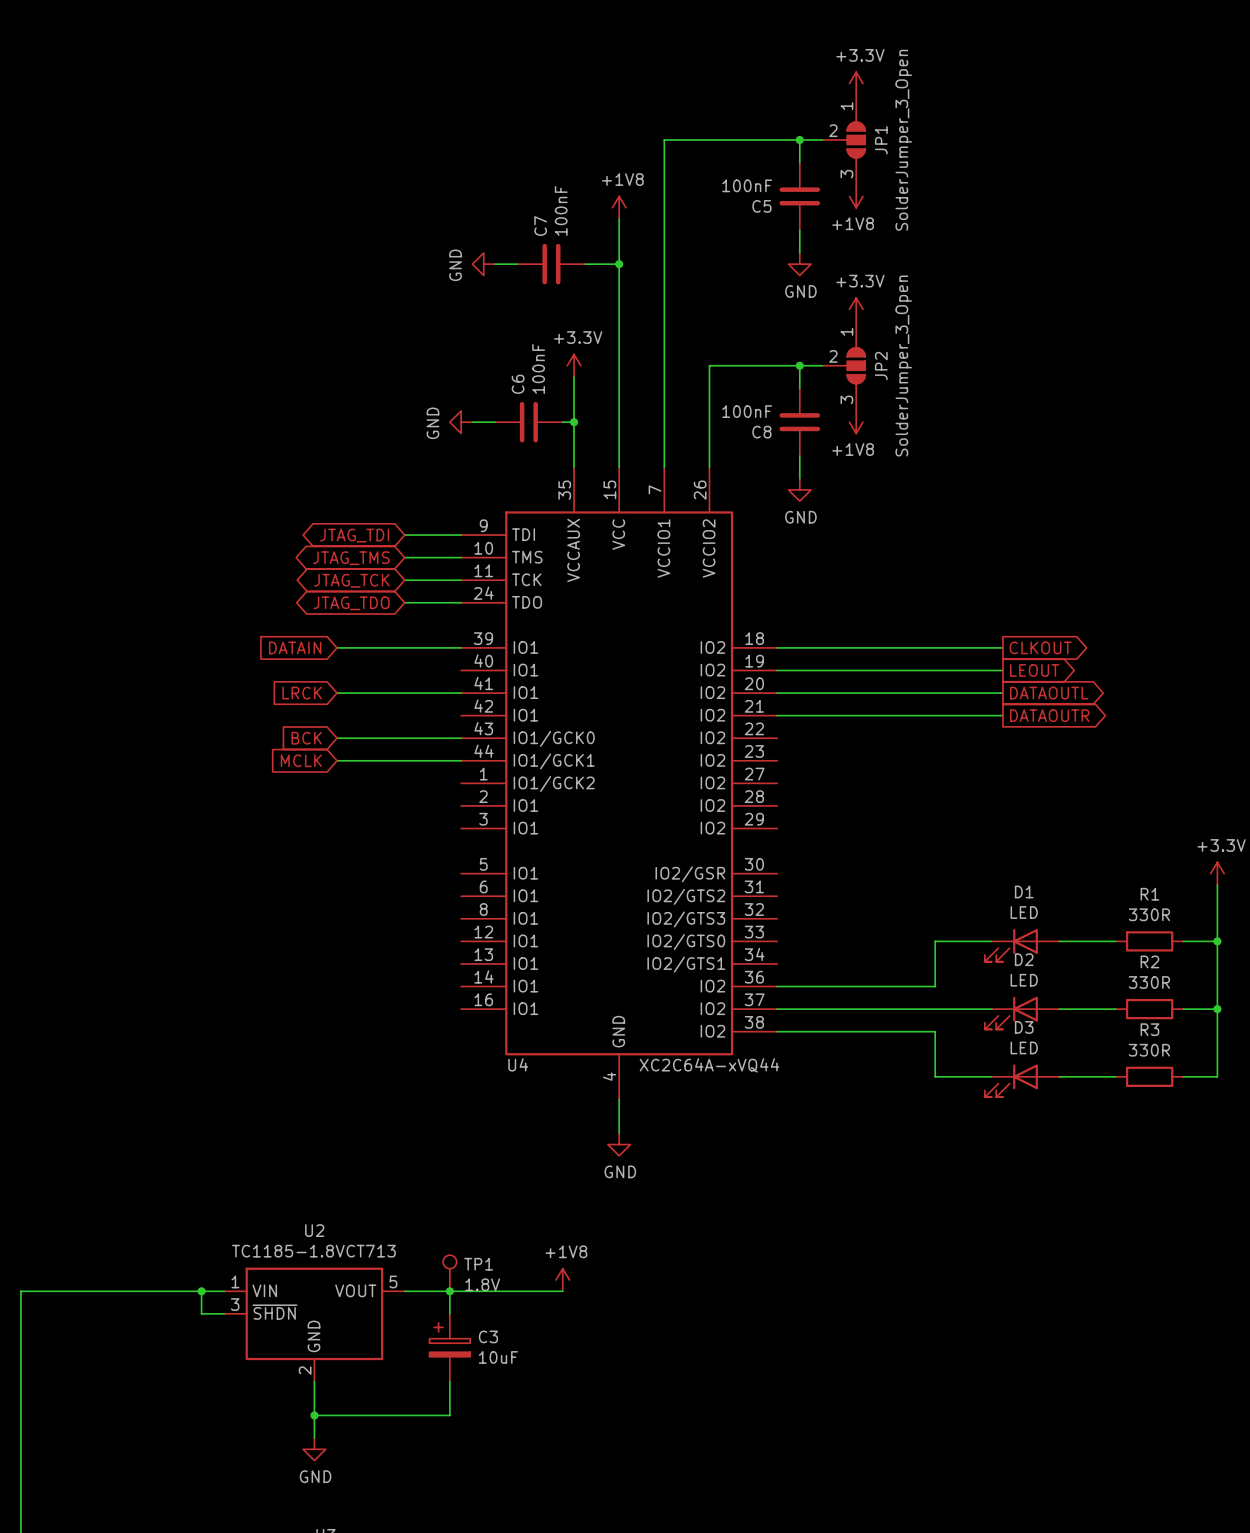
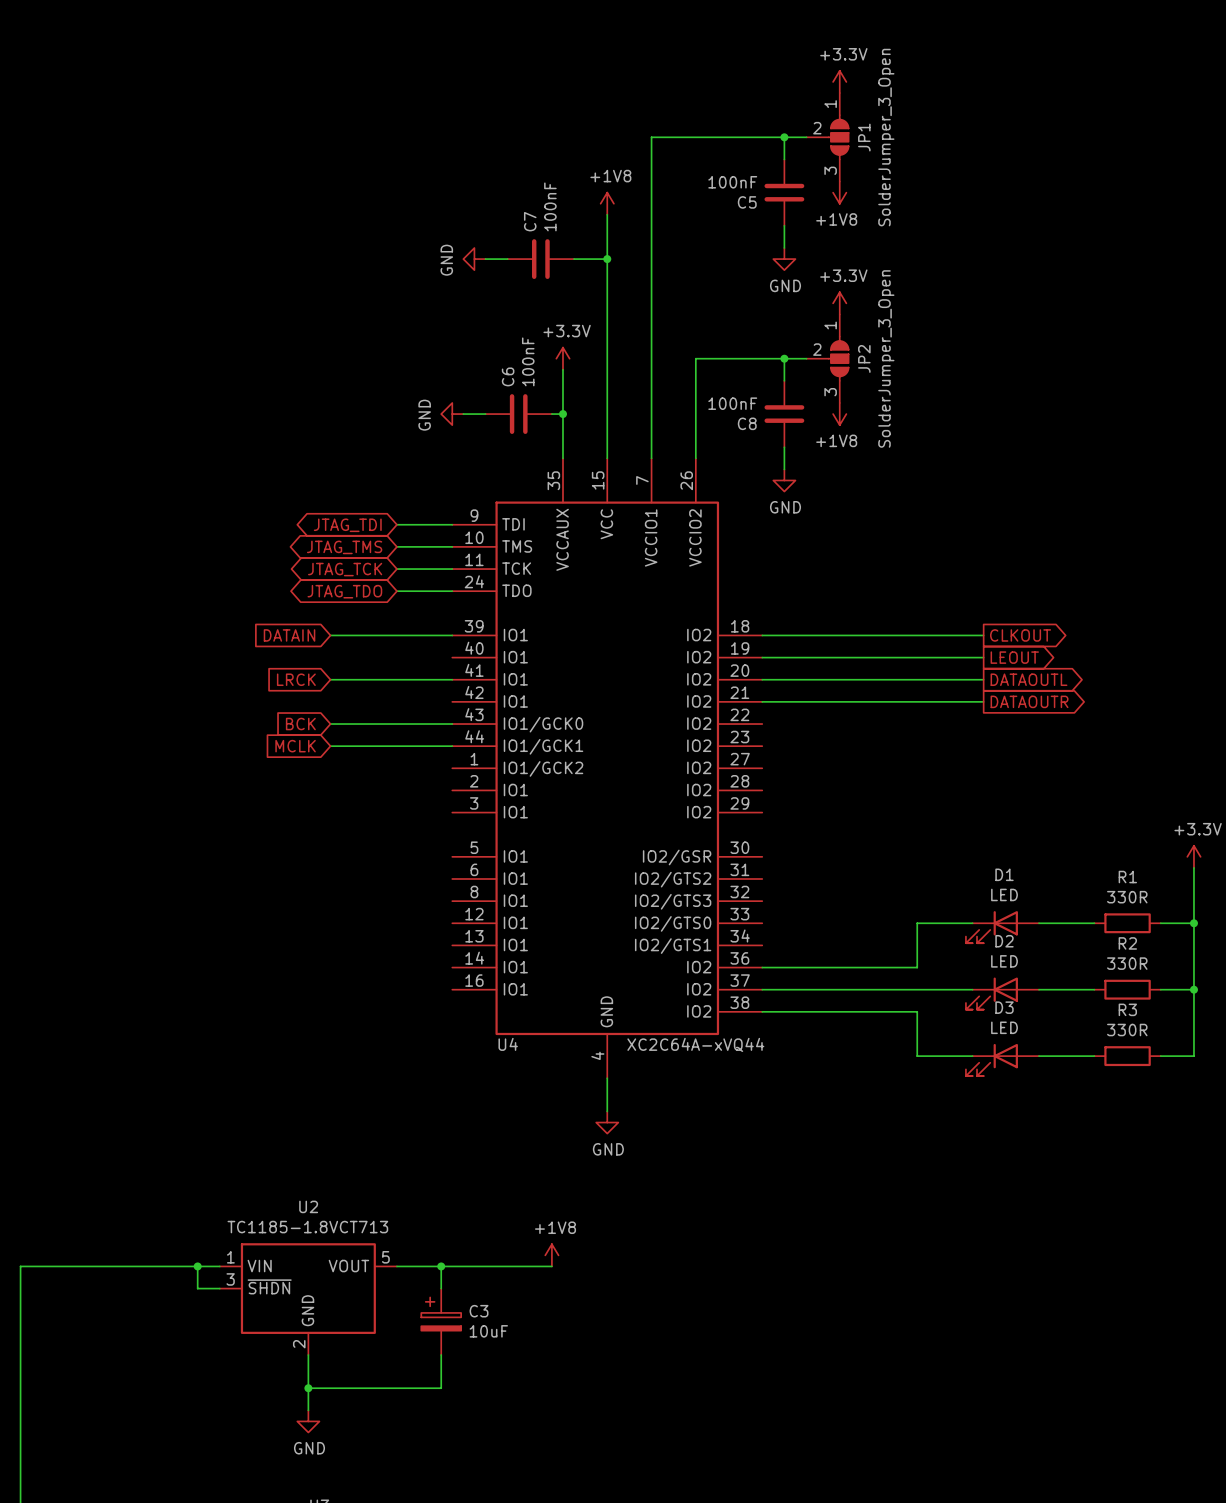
TP1: 1.8V (449, 1273) -> none

